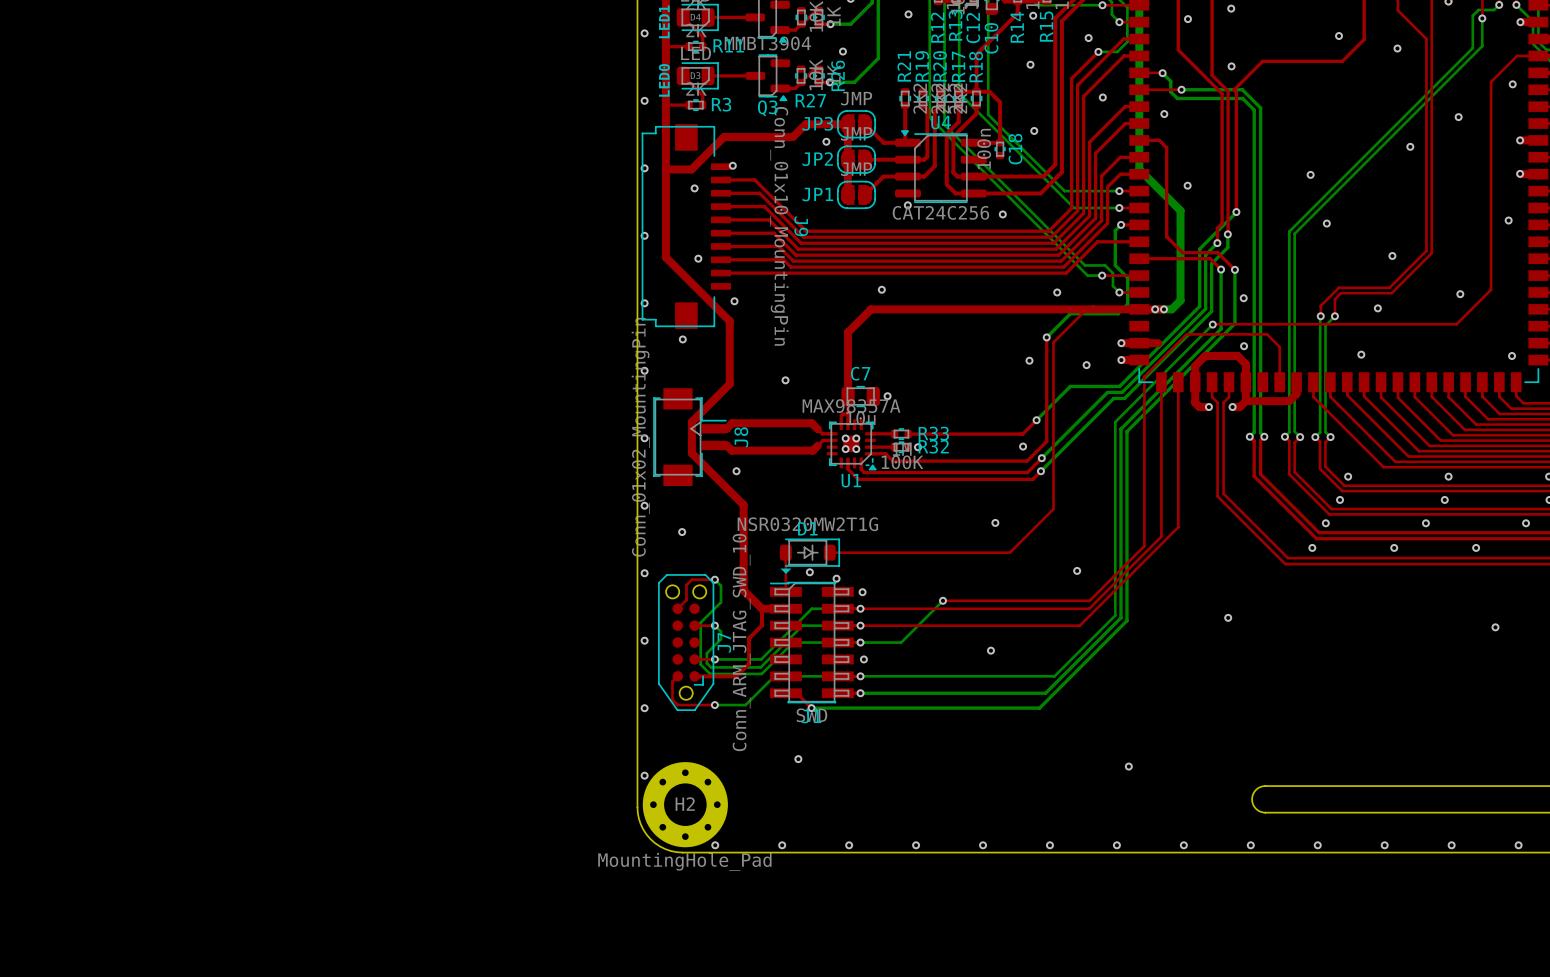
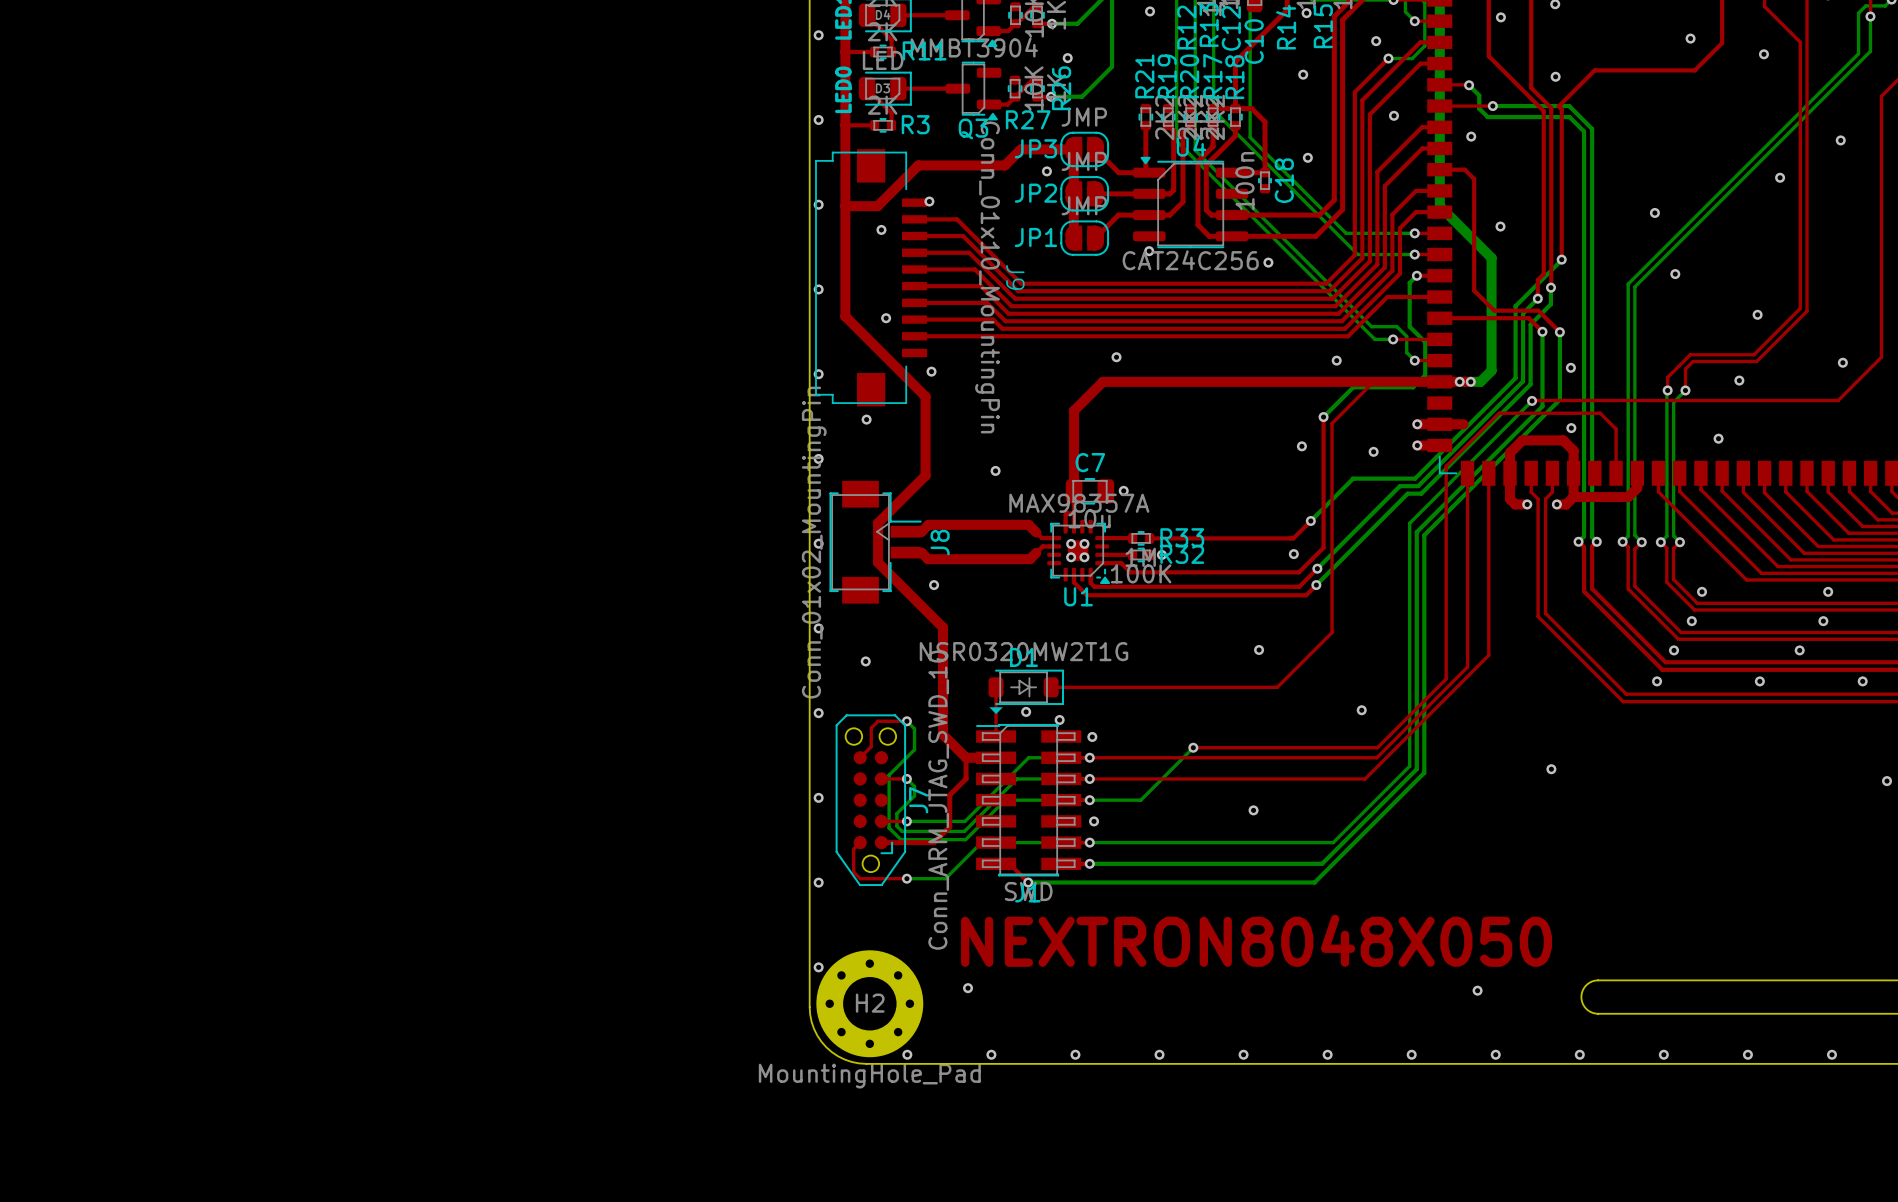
text: none -> NEXTRON8048X050 (1256, 940)
via position: (798, 759) -> (968, 988)
via position: (1128, 766) -> (1477, 990)

